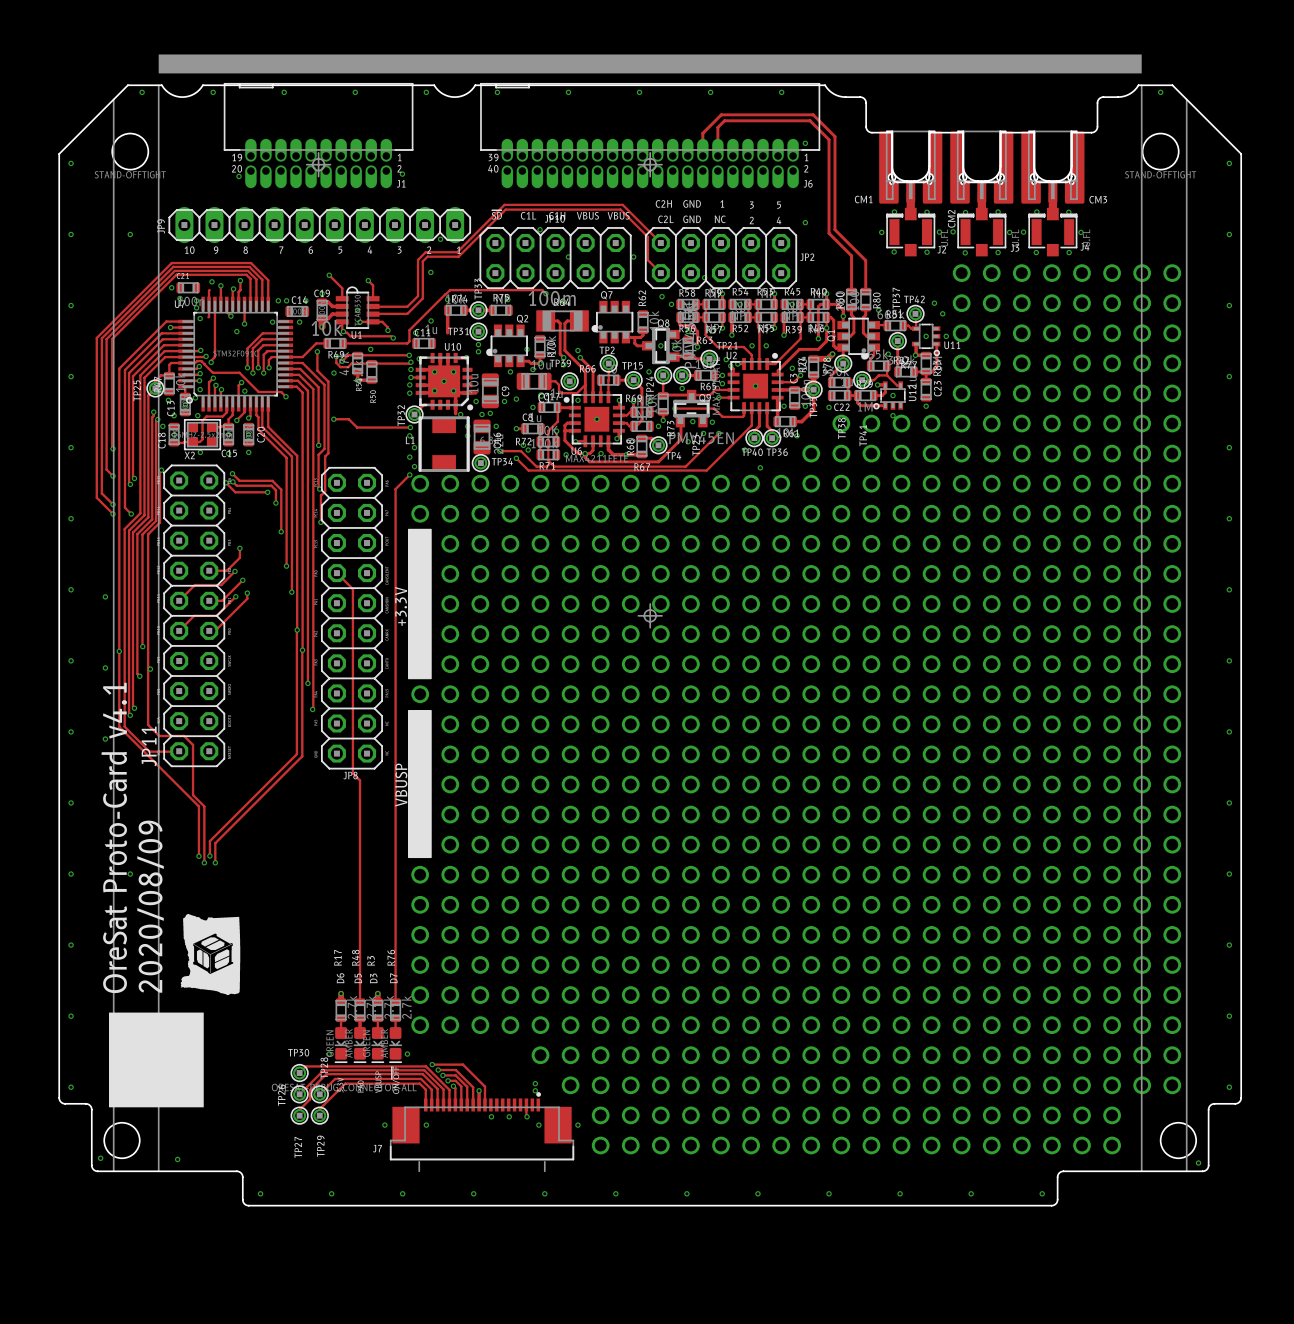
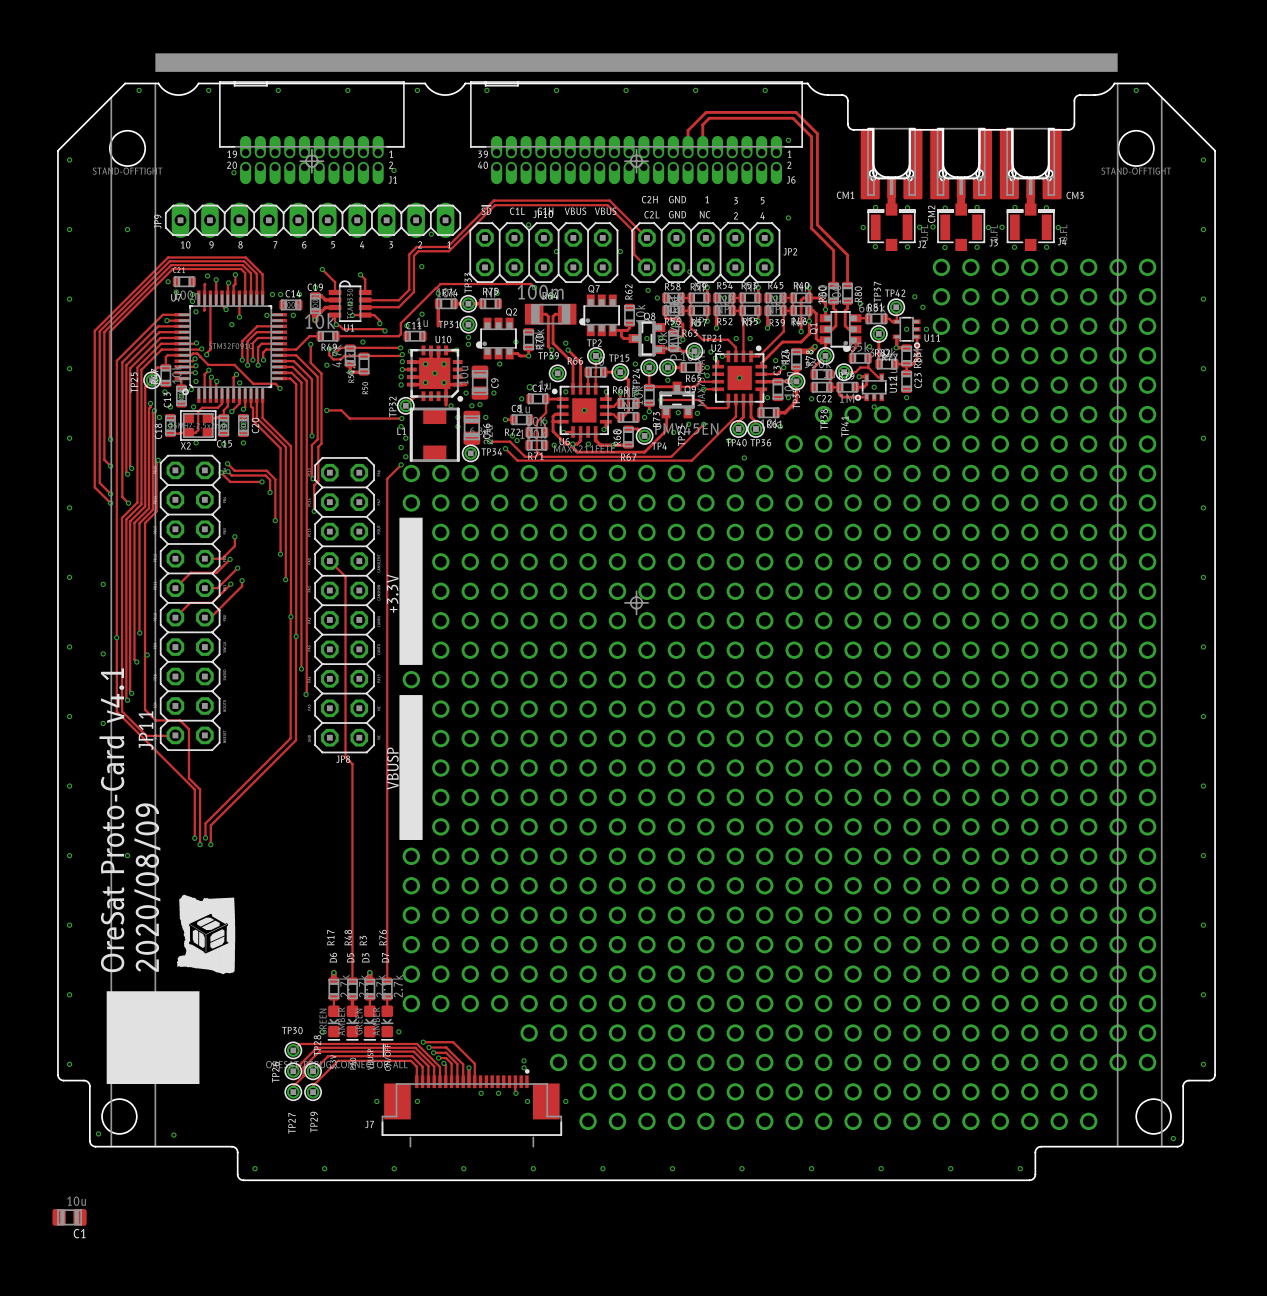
via: (532, 369) -> none
C1 position: (534, 381) -> (69, 1217)
track: (544, 381) (555, 381) (559, 384) (559, 390) (561, 393) (577, 393) (585, 384) -> none
via: (516, 399) -> none

